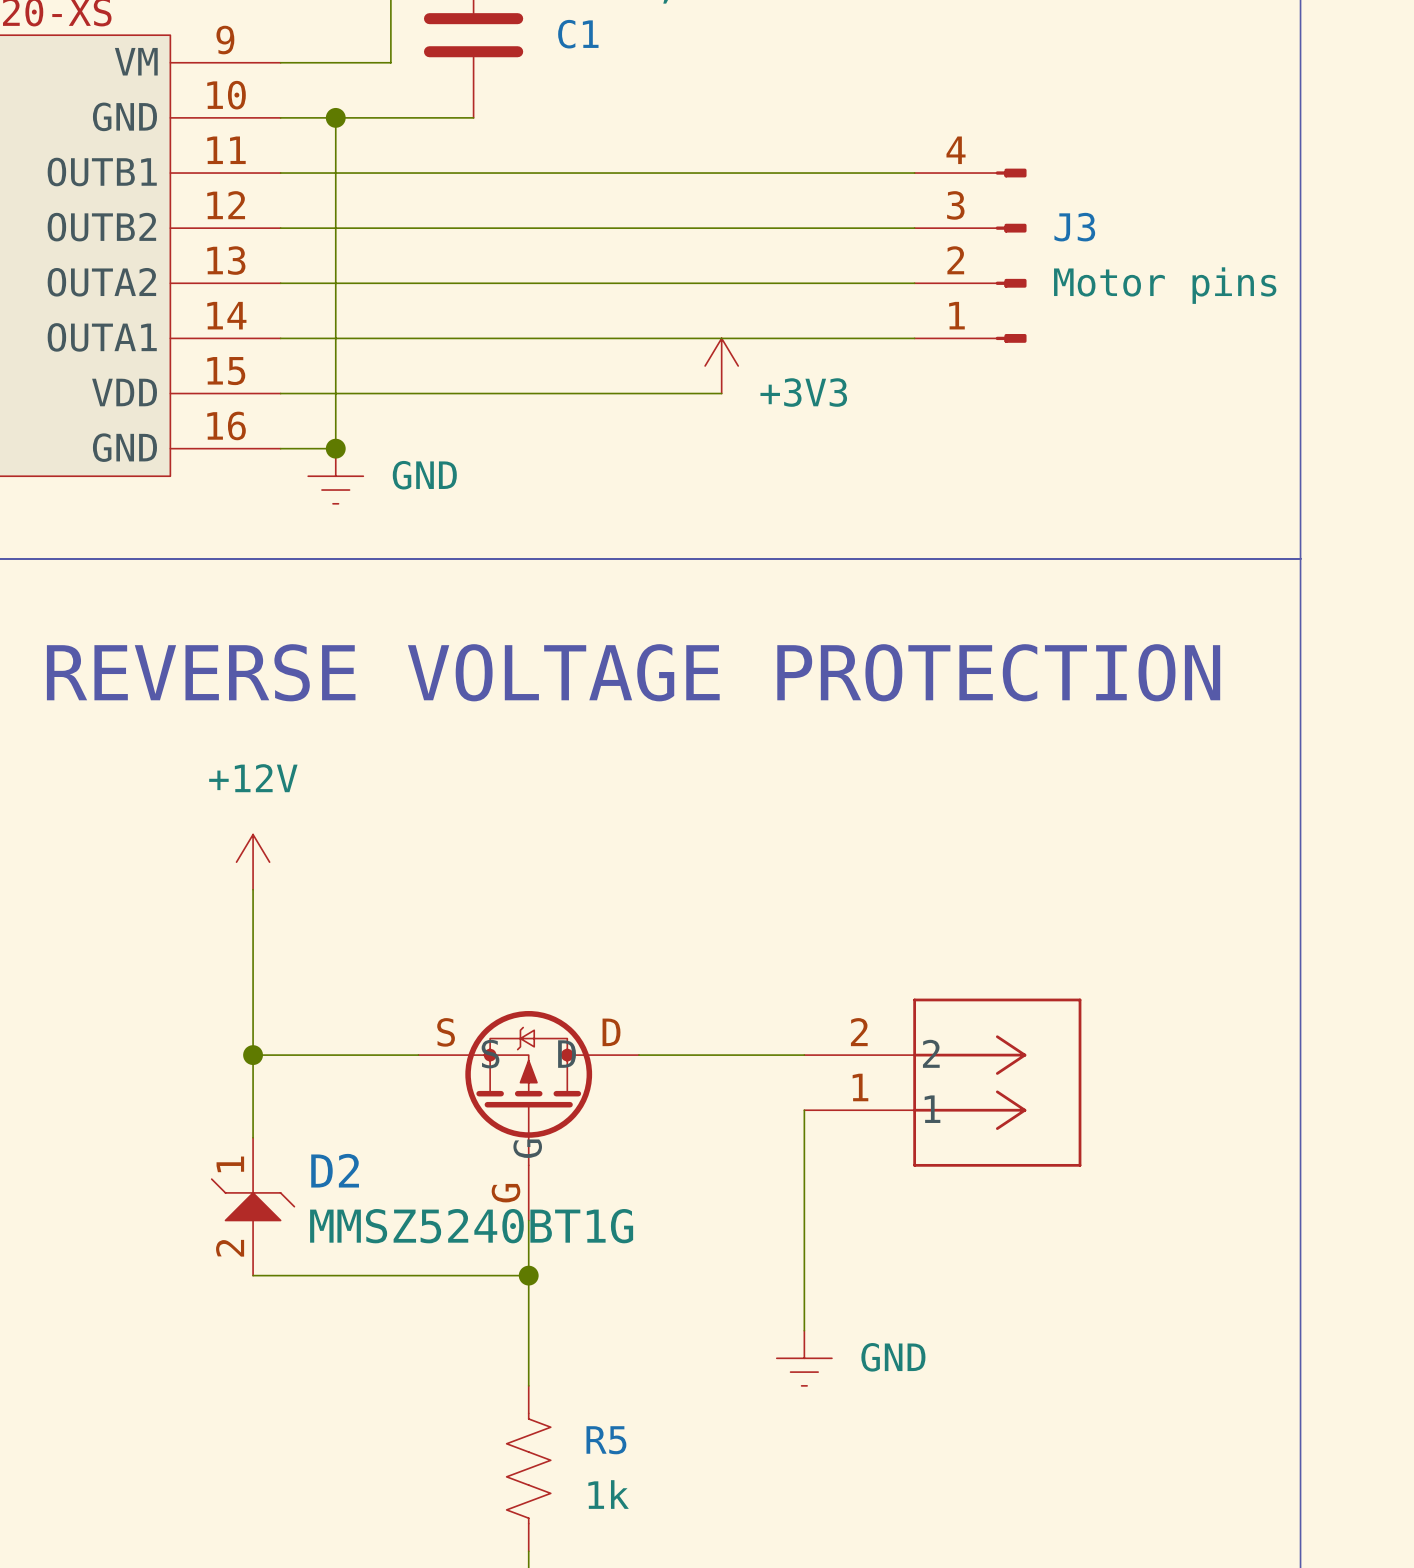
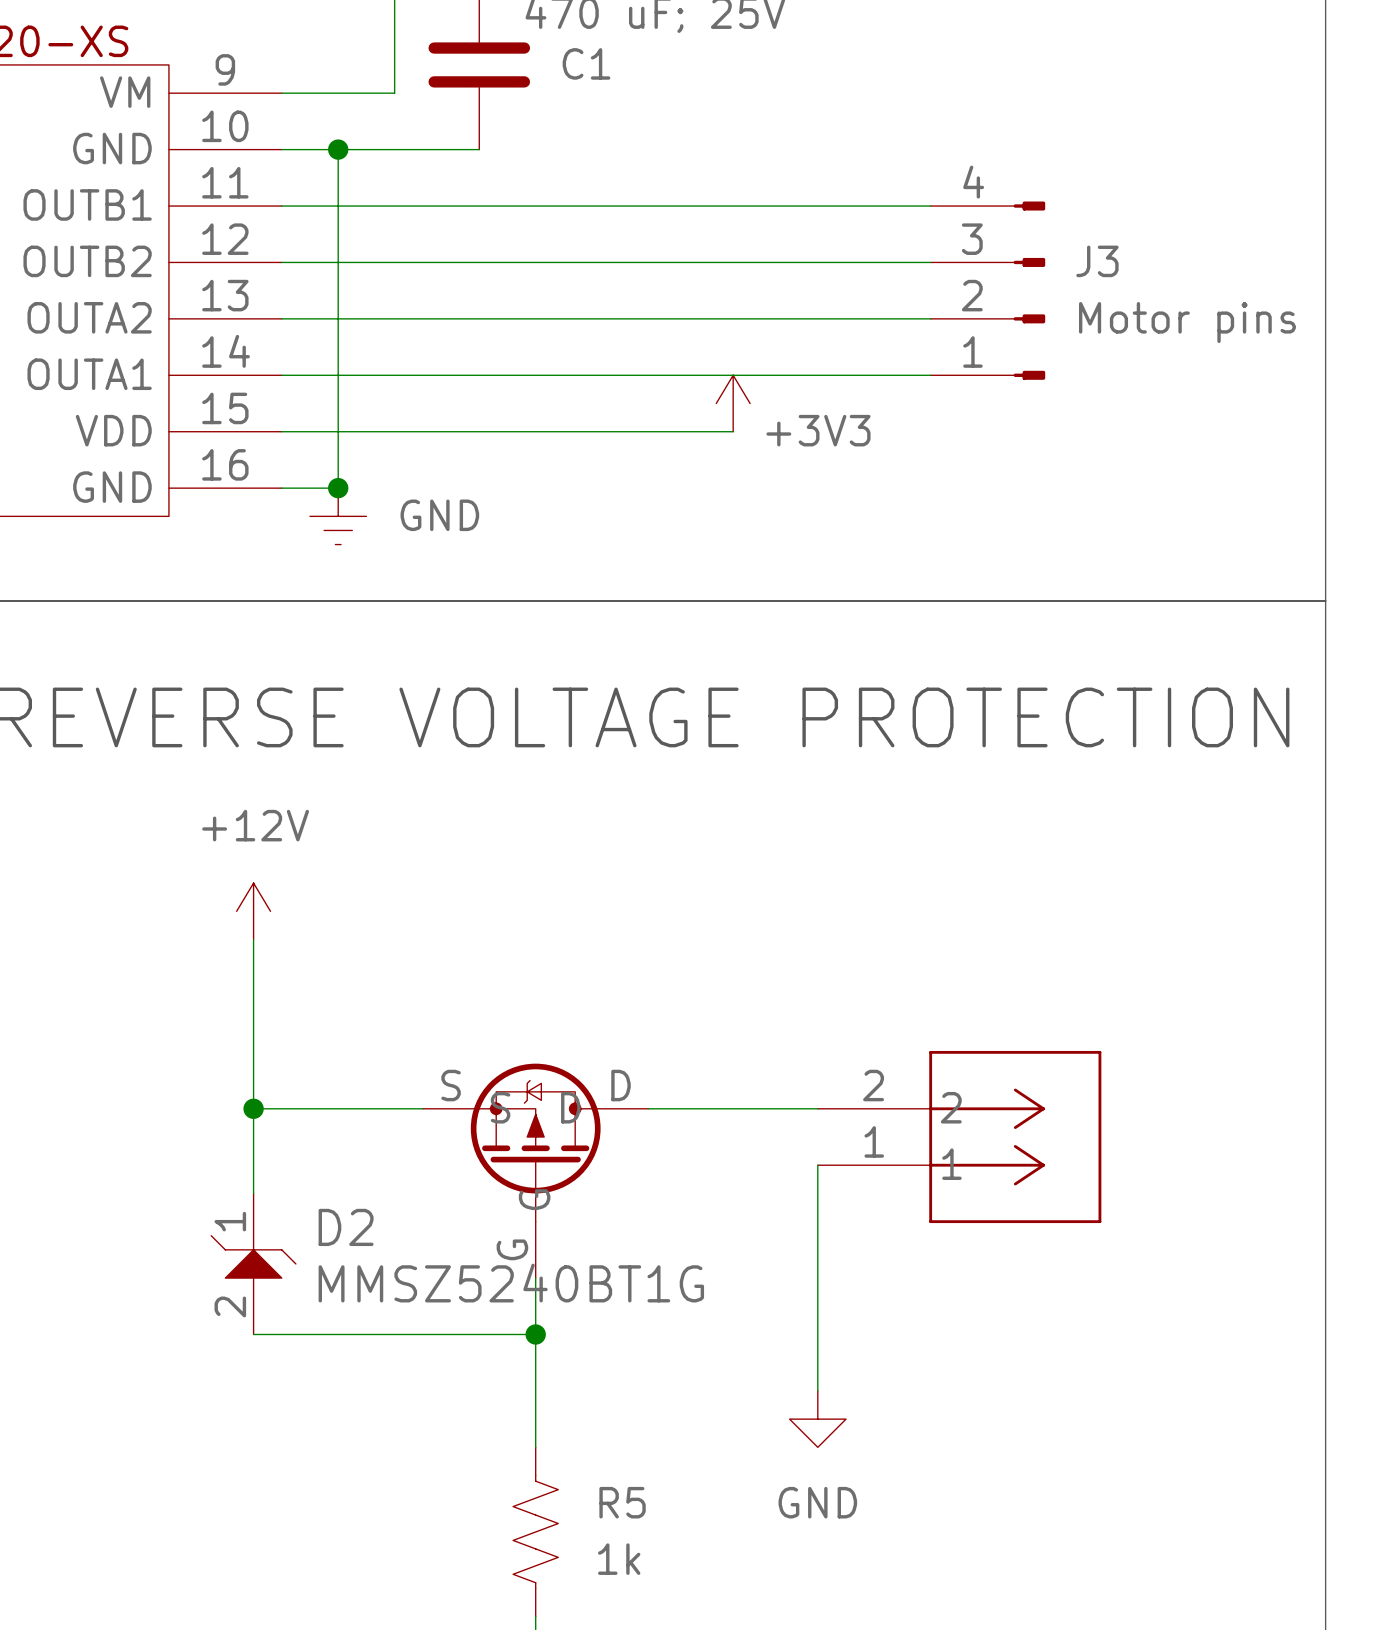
power symbol shape: [776, 1330, 832, 1386] -> [789, 1390, 847, 1448]
power symbol text position: GND (893, 1357) -> GND (817, 1502)

